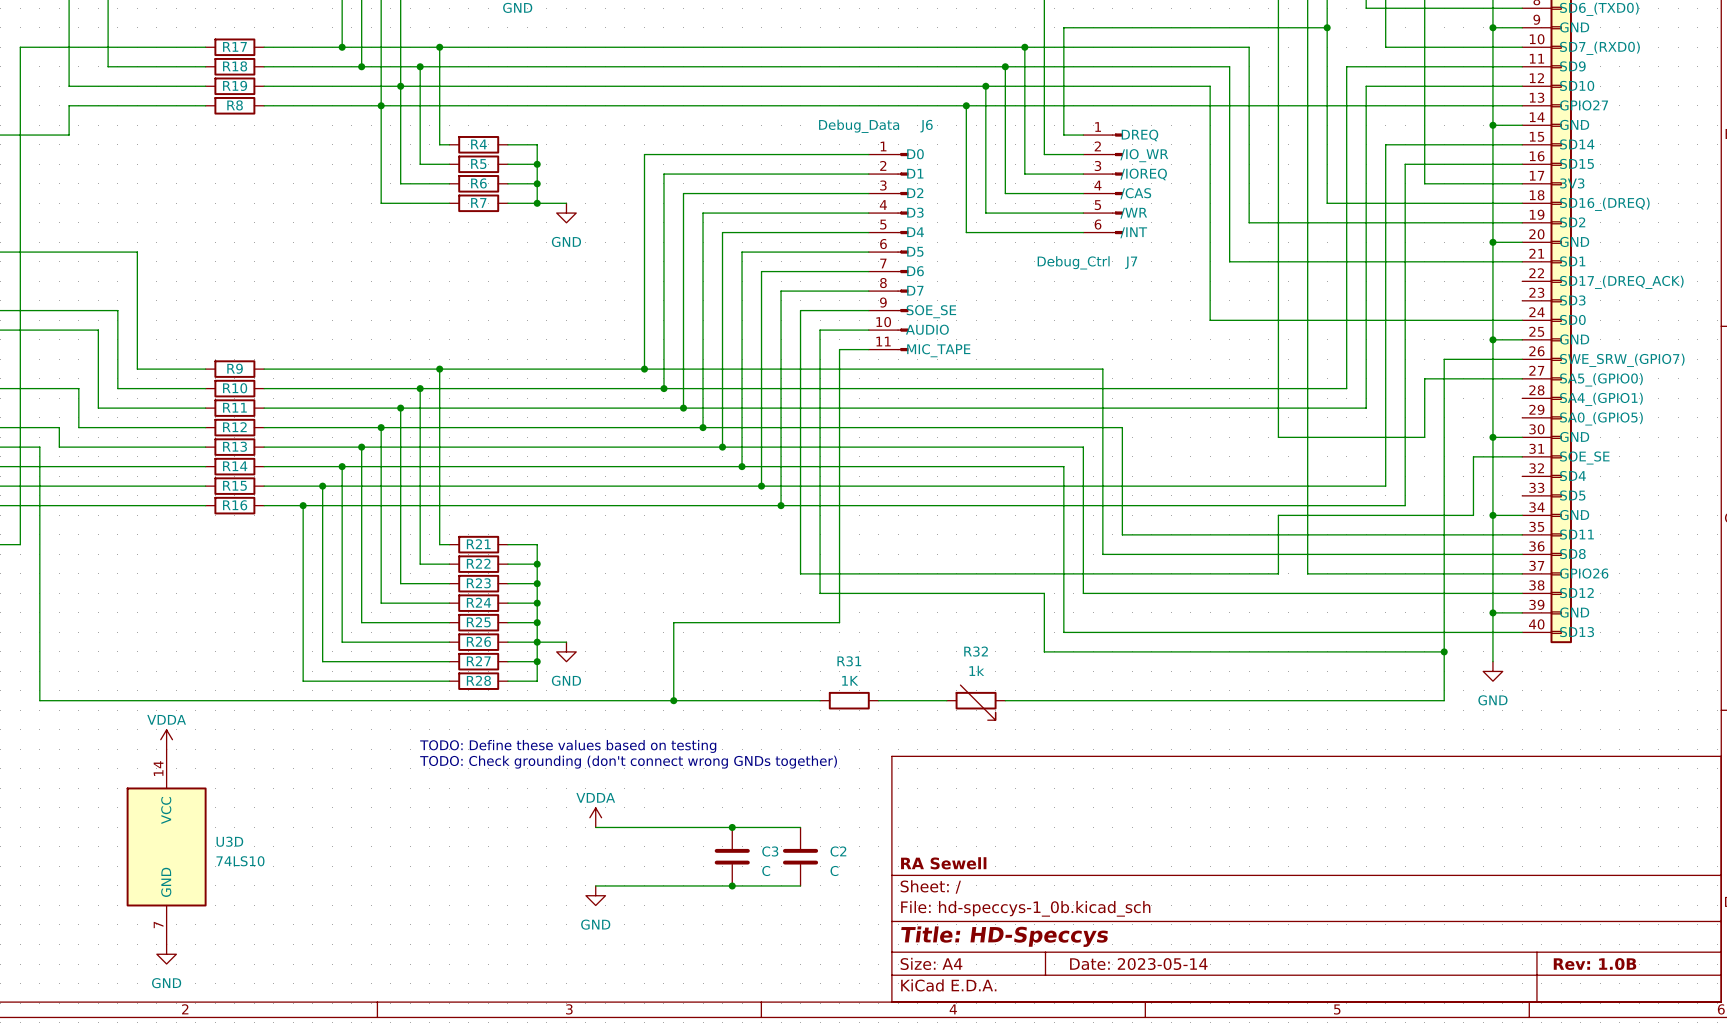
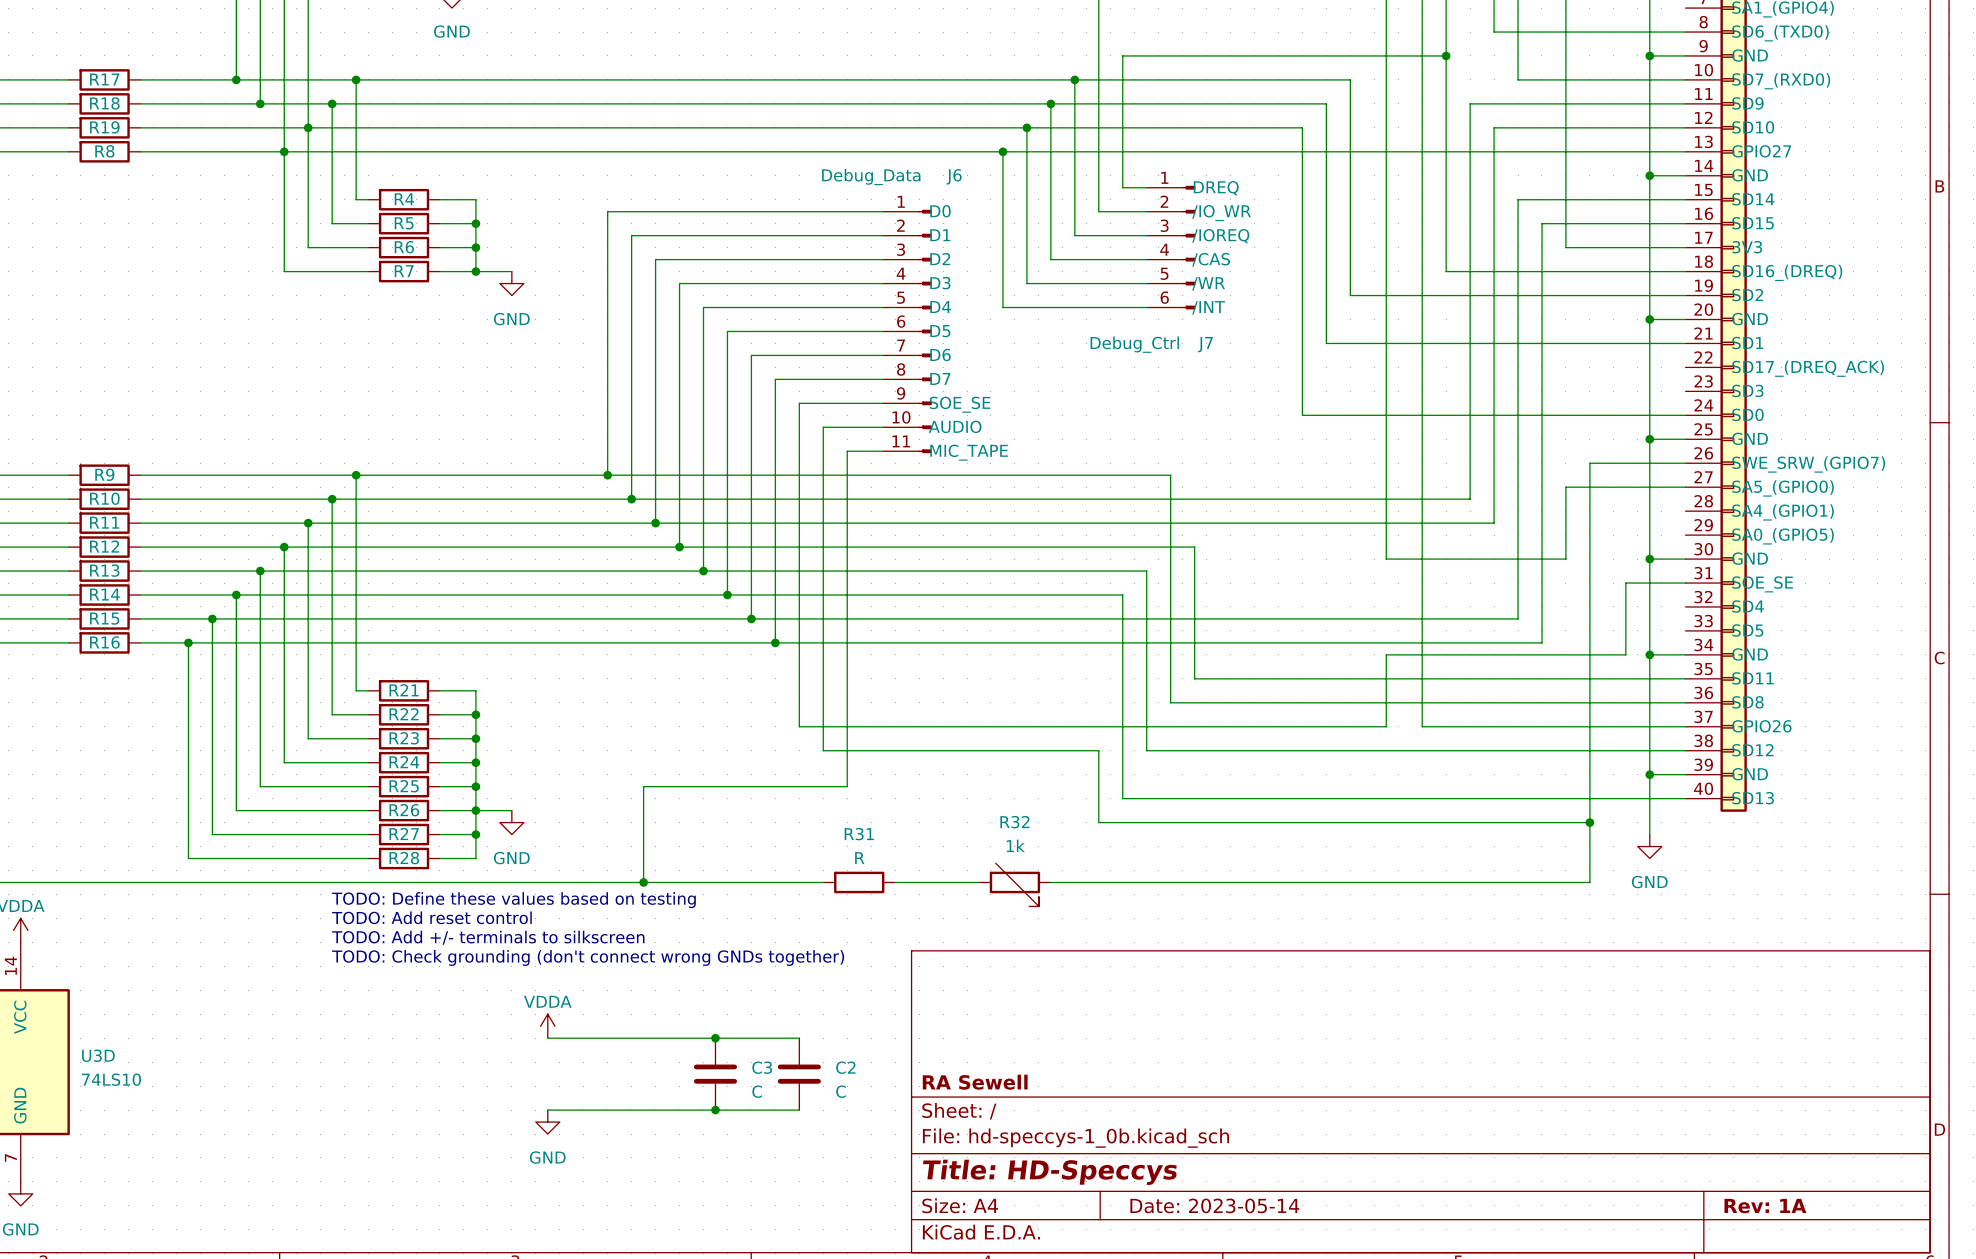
R31 value: 1K (850, 680) -> R (859, 858)
text: none -> TODO: Define these values based on testing (513, 900)
text: none -> TODO: Add reset control (431, 917)
text: TODO: Define these values based on testing (568, 746) -> TODO: Add +/- terminals to silkscreen (488, 937)
title block: Rev: 1.0B (1595, 964) -> Rev: 1A (1765, 1206)

